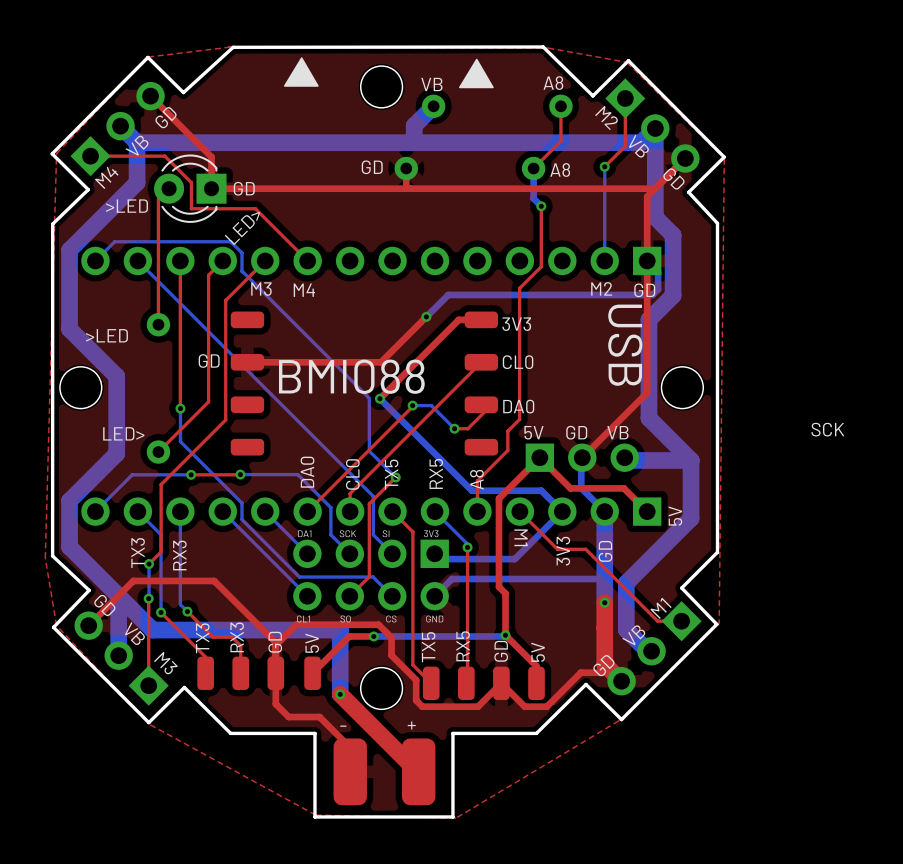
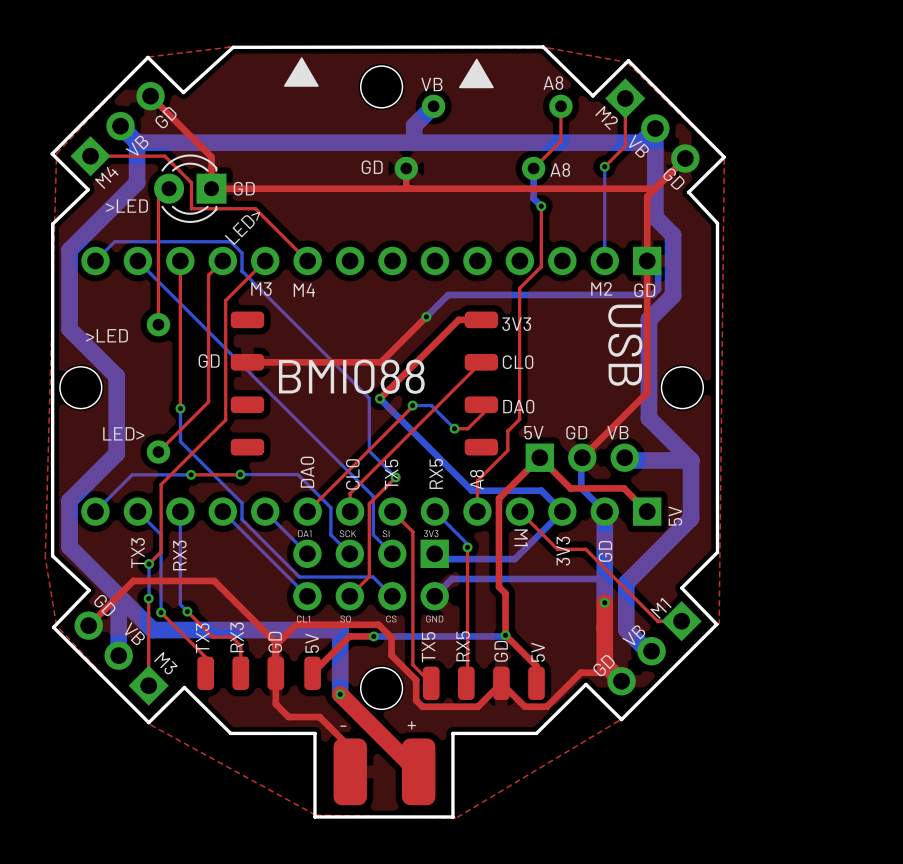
text: SCK (827, 429) -> none

